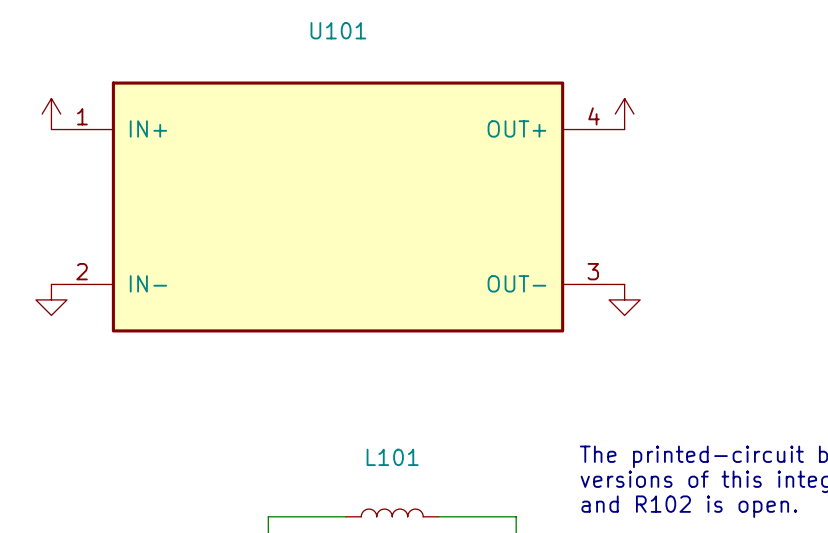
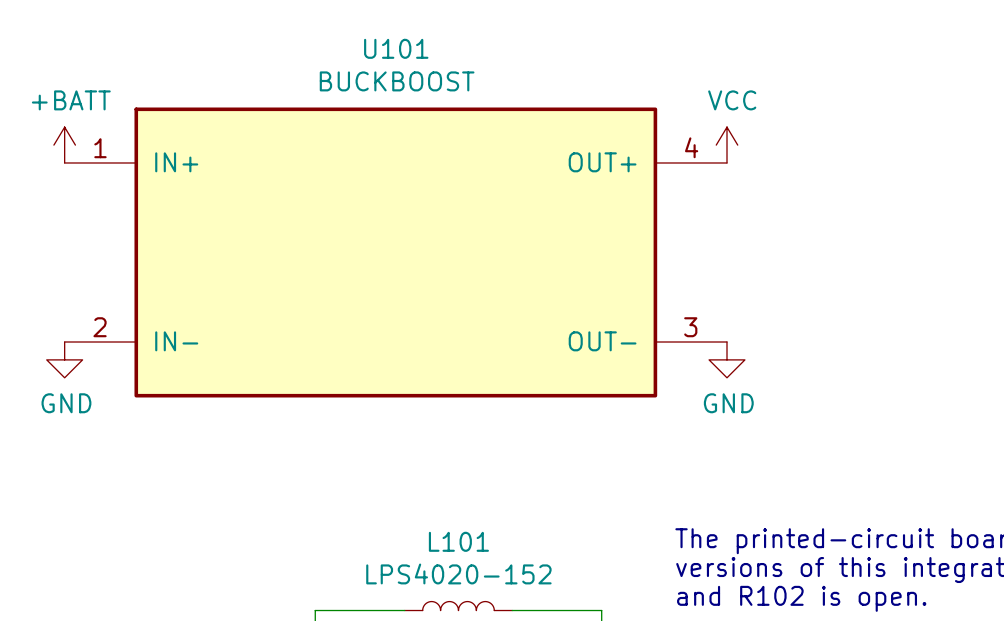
U101 value: none -> BUCKBOOST (397, 81)
power symbol text: none -> +BATT (71, 100)
power symbol text: none -> VCC (732, 100)
power symbol text: none -> GND (66, 403)
power symbol text: none -> GND (728, 403)
L101 value: none -> LPS4020-152 (458, 573)

